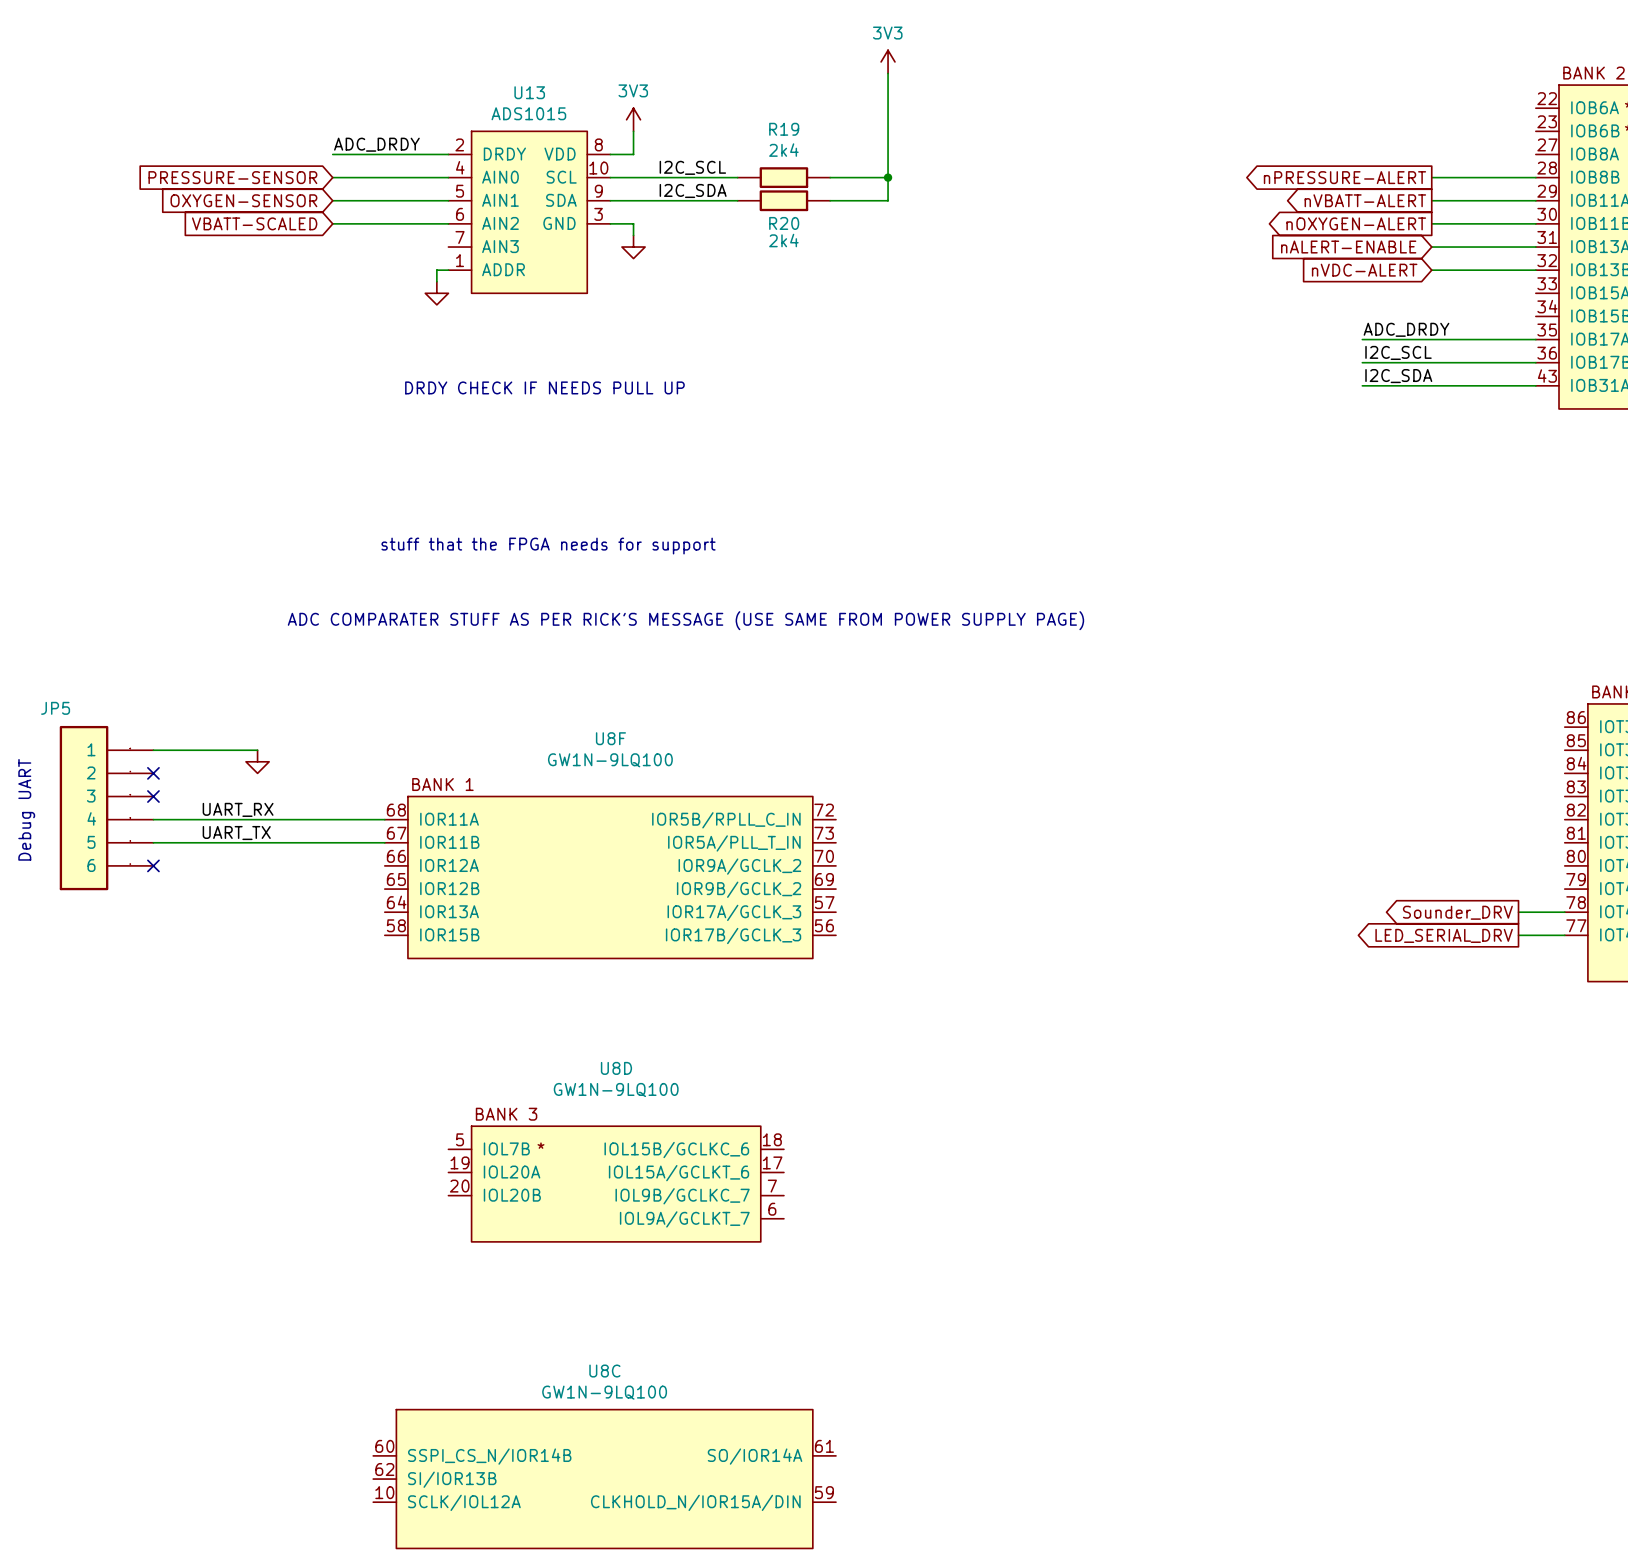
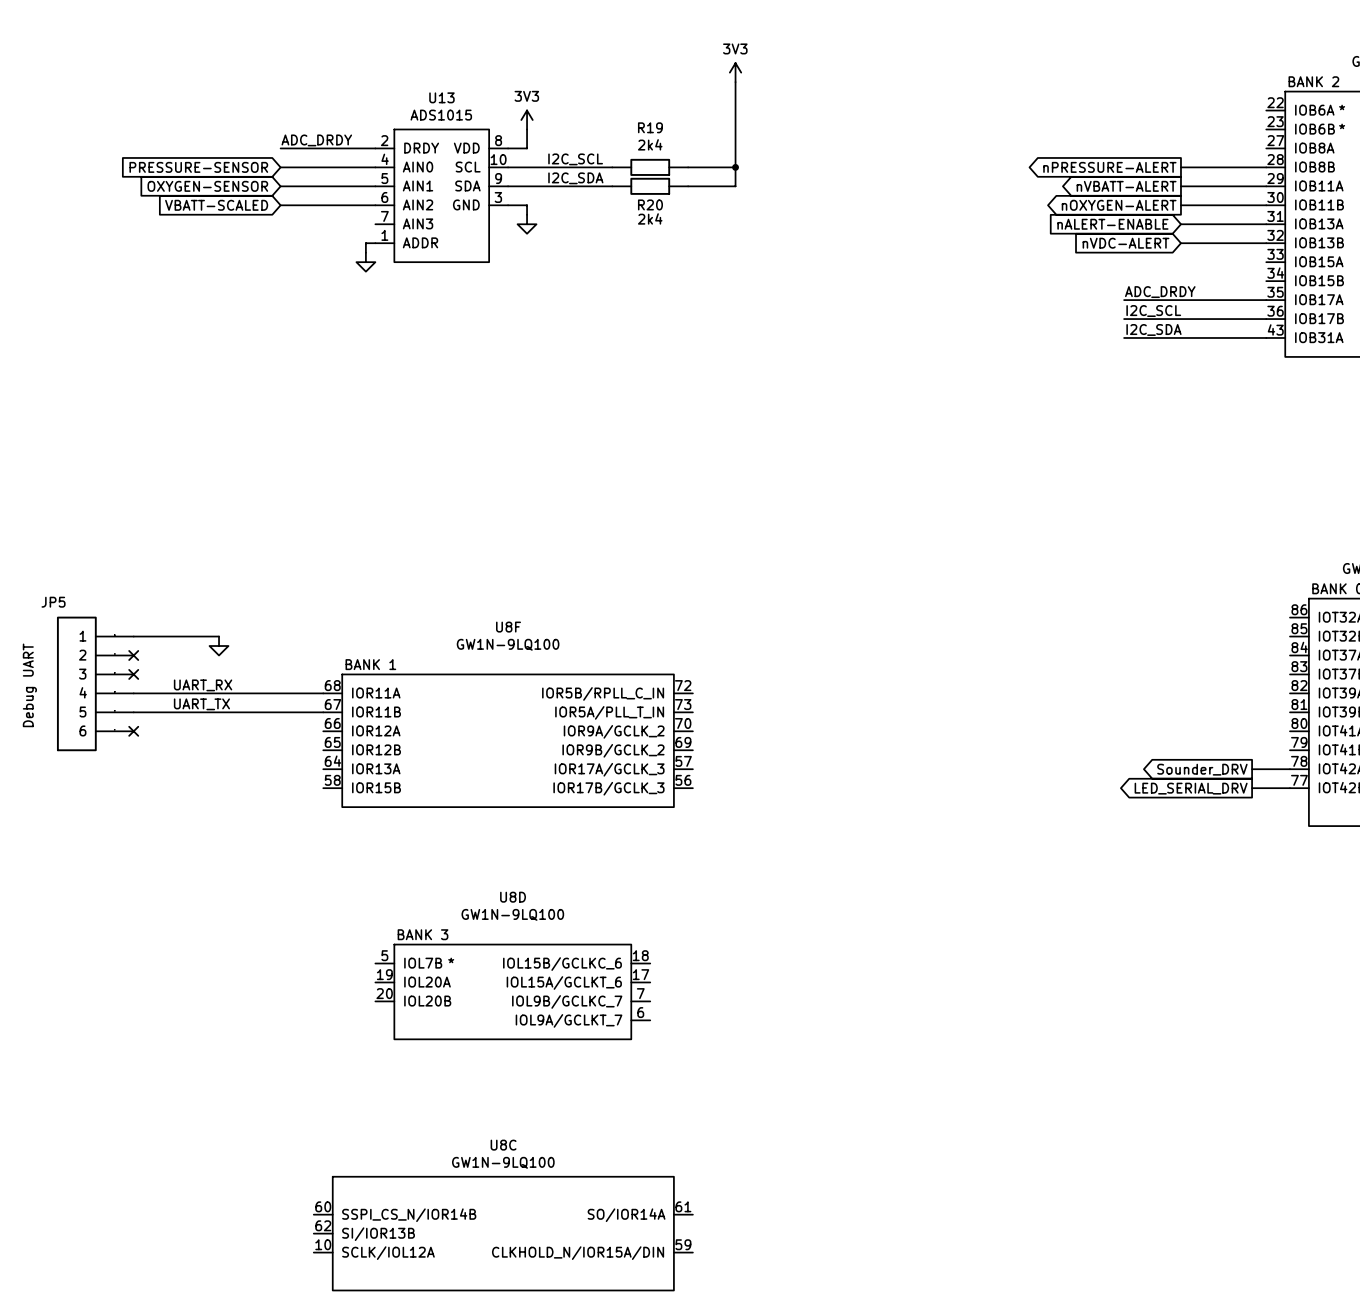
text: DRDY CHECK IF NEEDS PULL UP (544, 387) -> none
text: stuff that the FPGA needs for support (548, 546) -> none
text: ADC COMPARATER STUFF AS PER RICK'S MESSAGE (USE SAME FROM POWER SUPPLY PAGE) (685, 620) -> none

